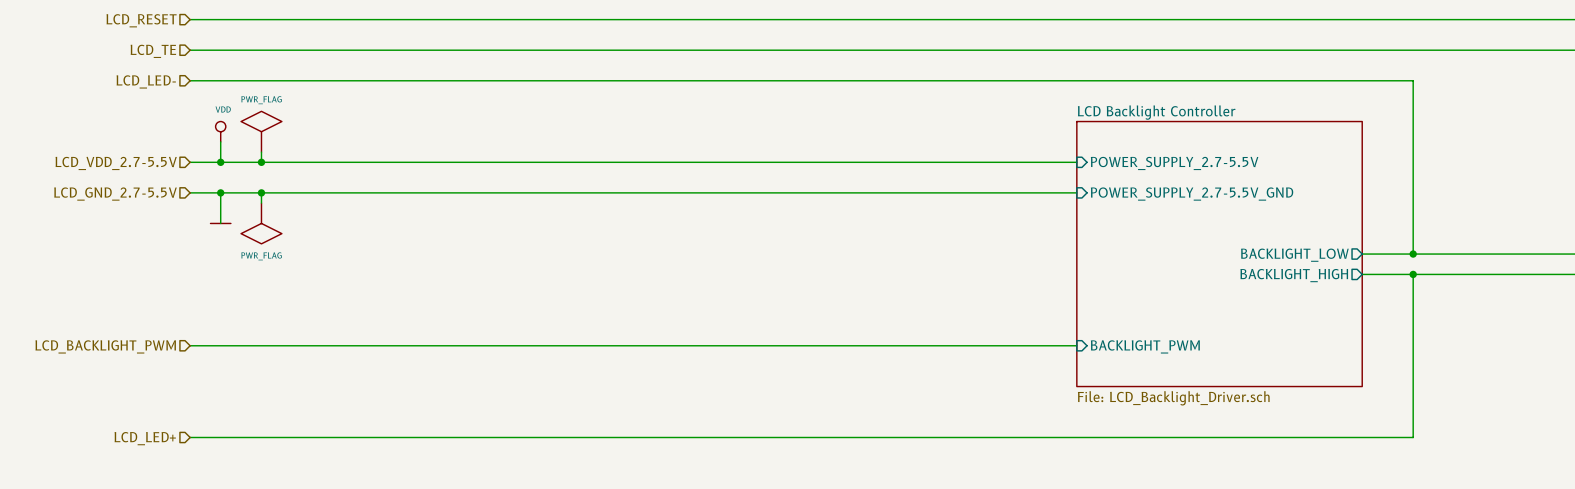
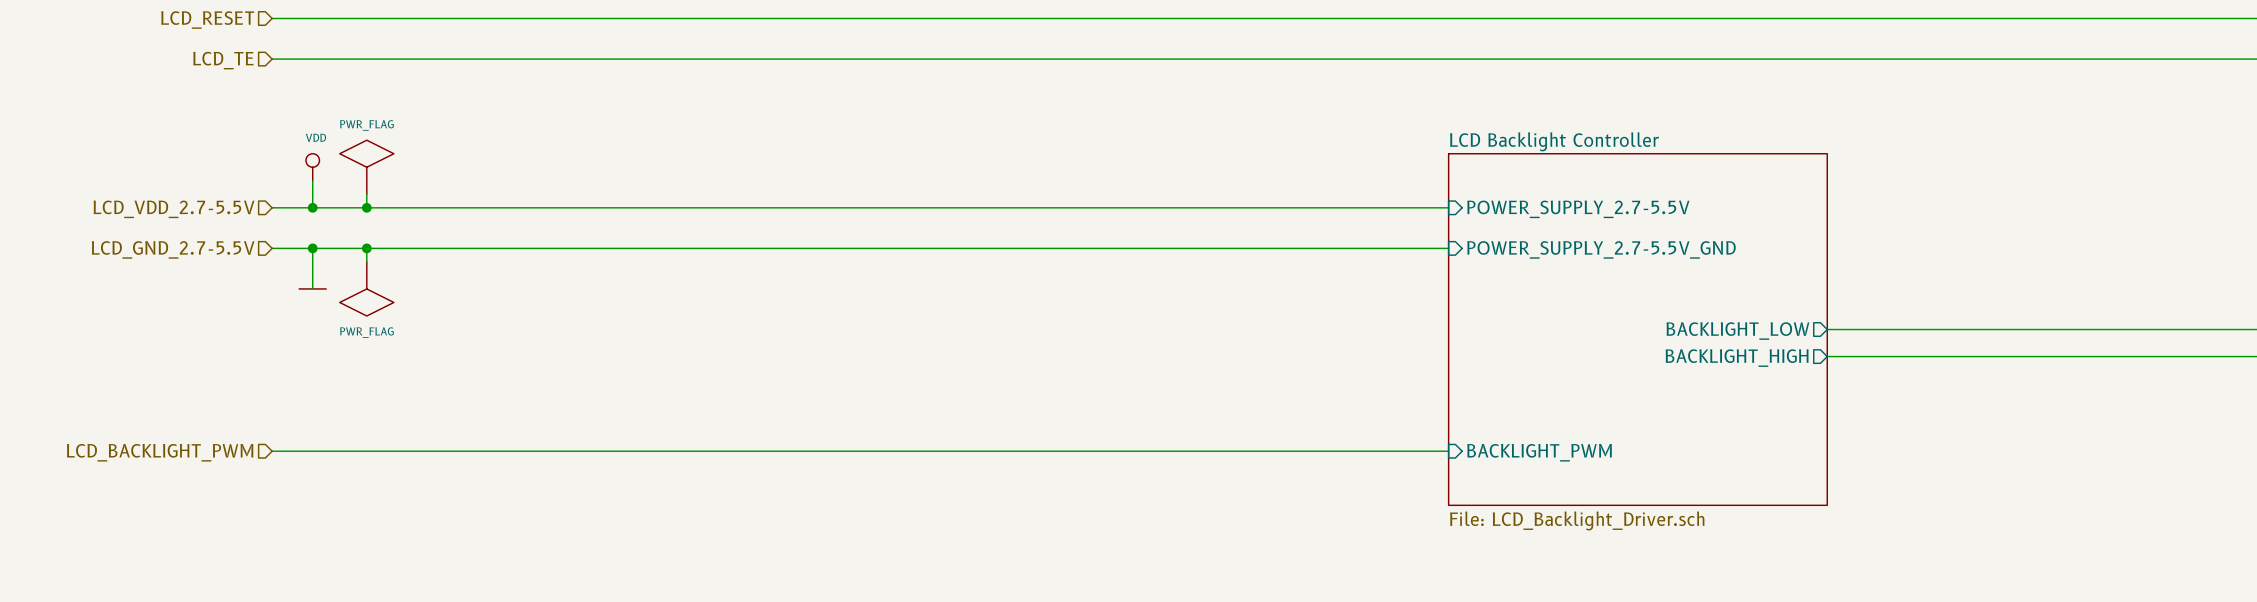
wire: (190, 80) (1413, 80) (1413, 254) -> none
hierarchical label: LCD_LED- (146, 81) -> none
junction: (1413, 254) -> none
wire: (1413, 274) (1413, 437) (190, 437) -> none
junction: (1413, 274) -> none
hierarchical label: LCD_LED+ (145, 438) -> none

